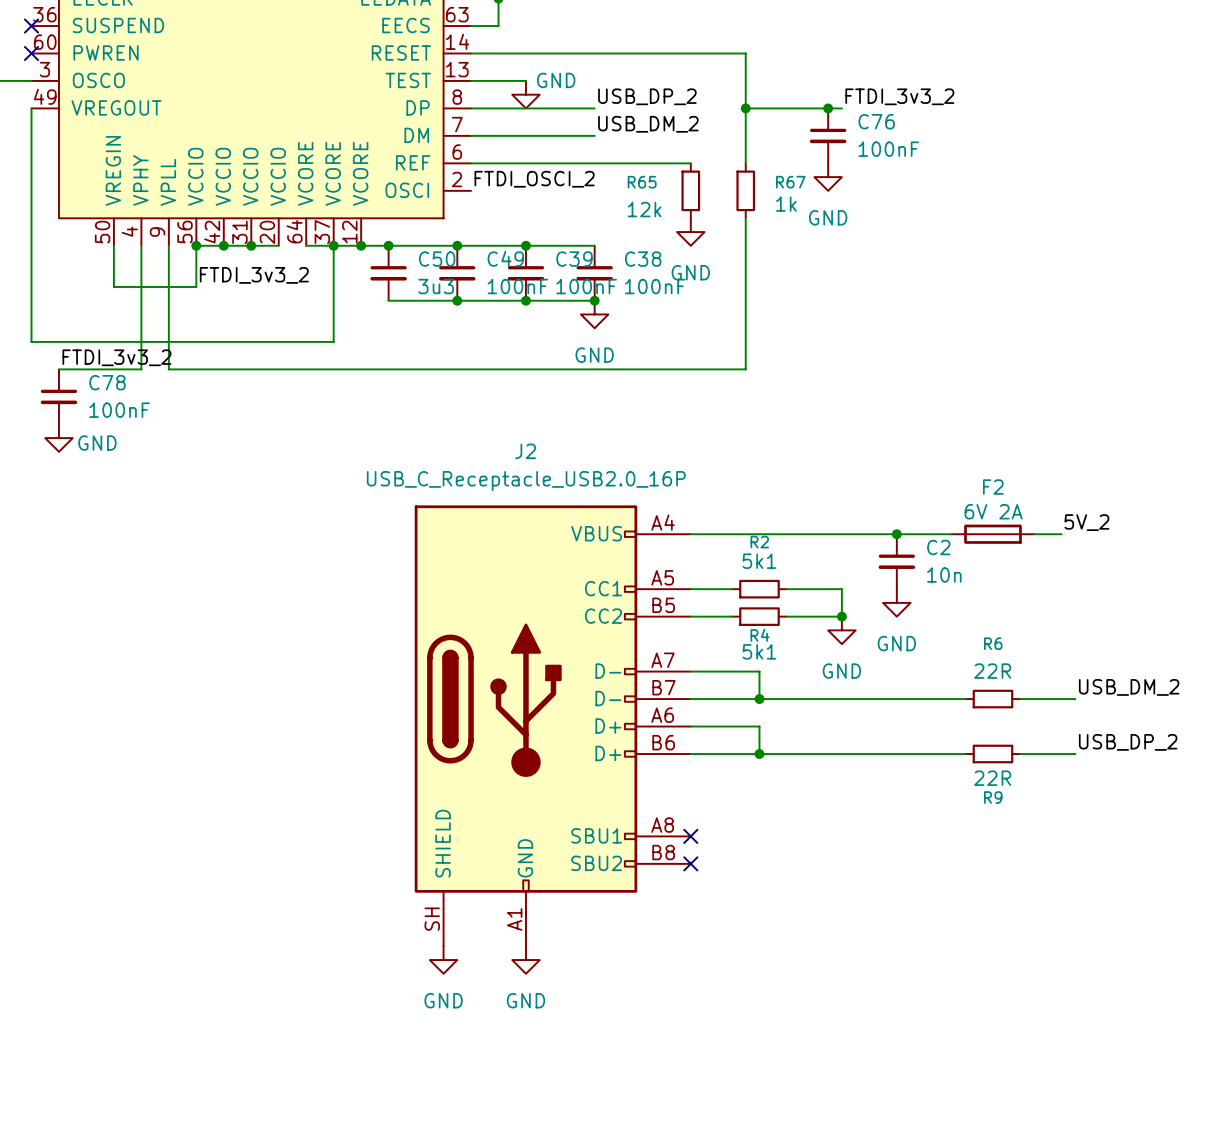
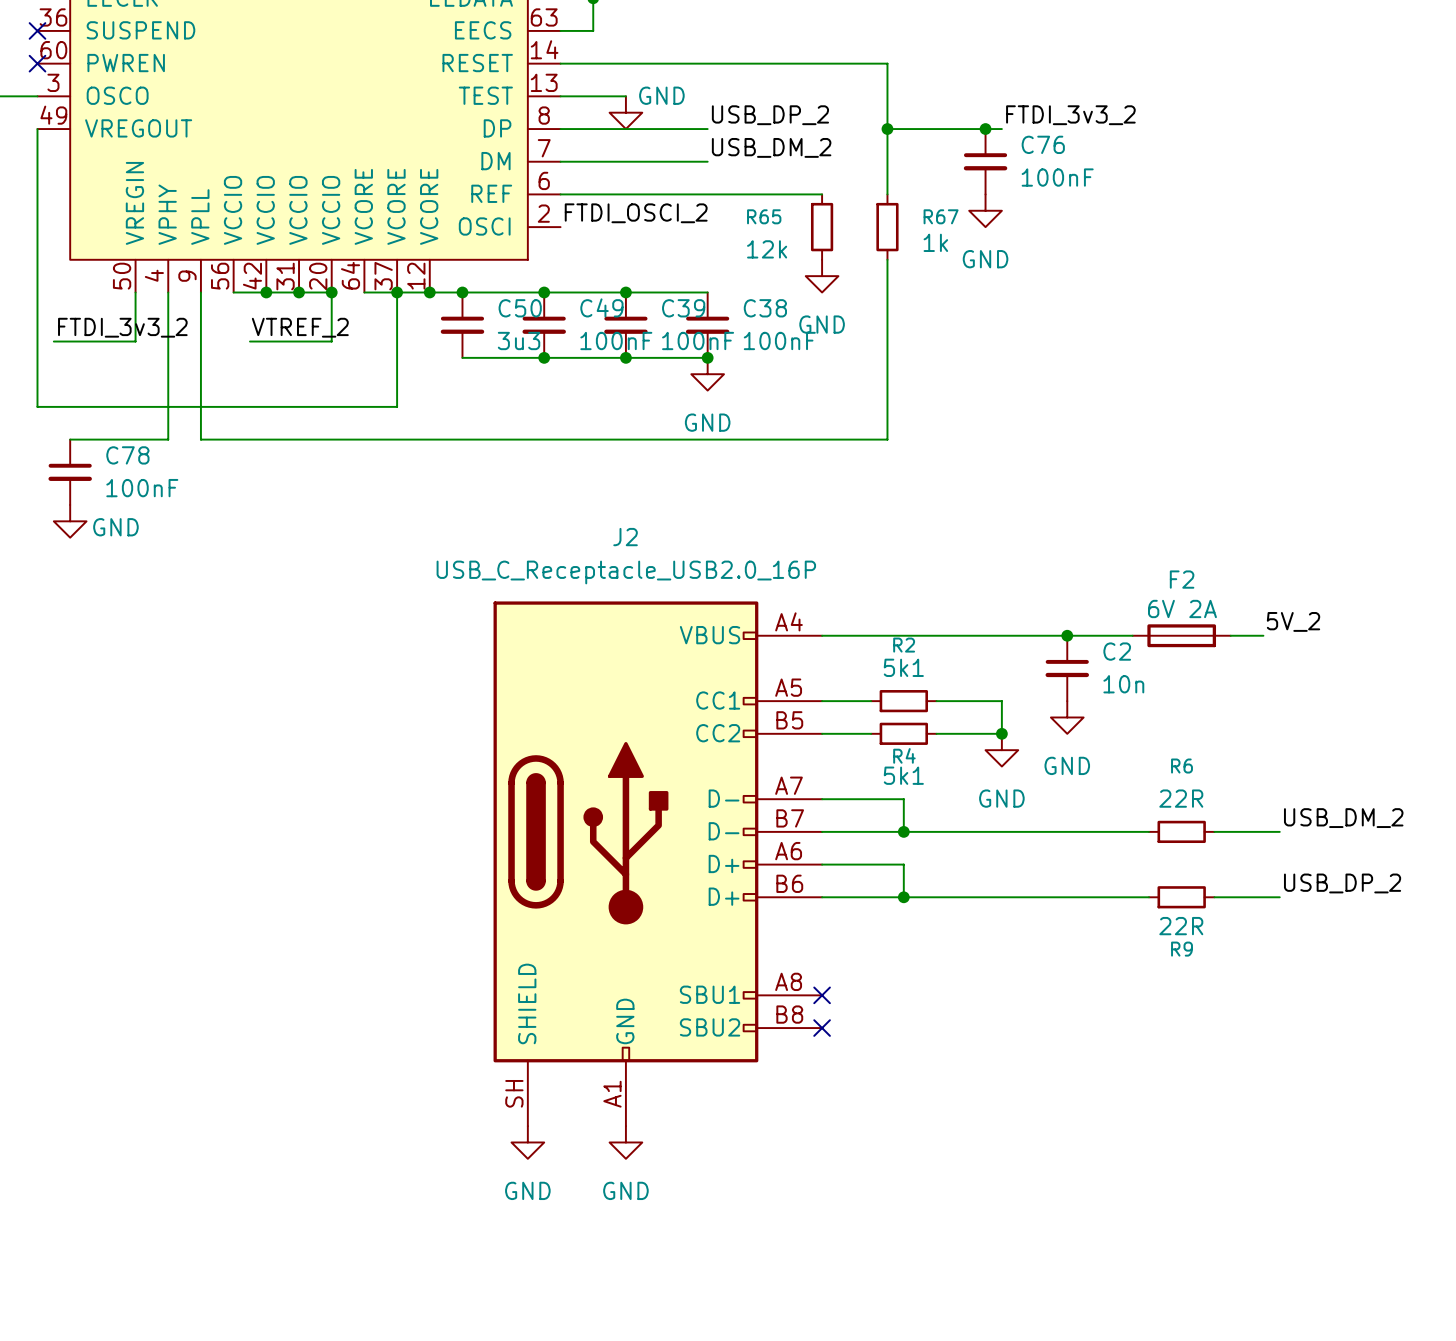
wire: (196, 245) (196, 286) (113, 286) -> (53, 341) (135, 341)
junction: (196, 245) -> none
wire: none -> (331, 292) (331, 341) (249, 341)
junction: none -> (331, 292)
label: none -> FTDI_3v3_2 (122, 327)
label: none -> VTREF_2 (300, 327)
label: FTDI_3v3_2 (254, 275) -> none
label: FTDI_3v3_2 (116, 357) -> none

